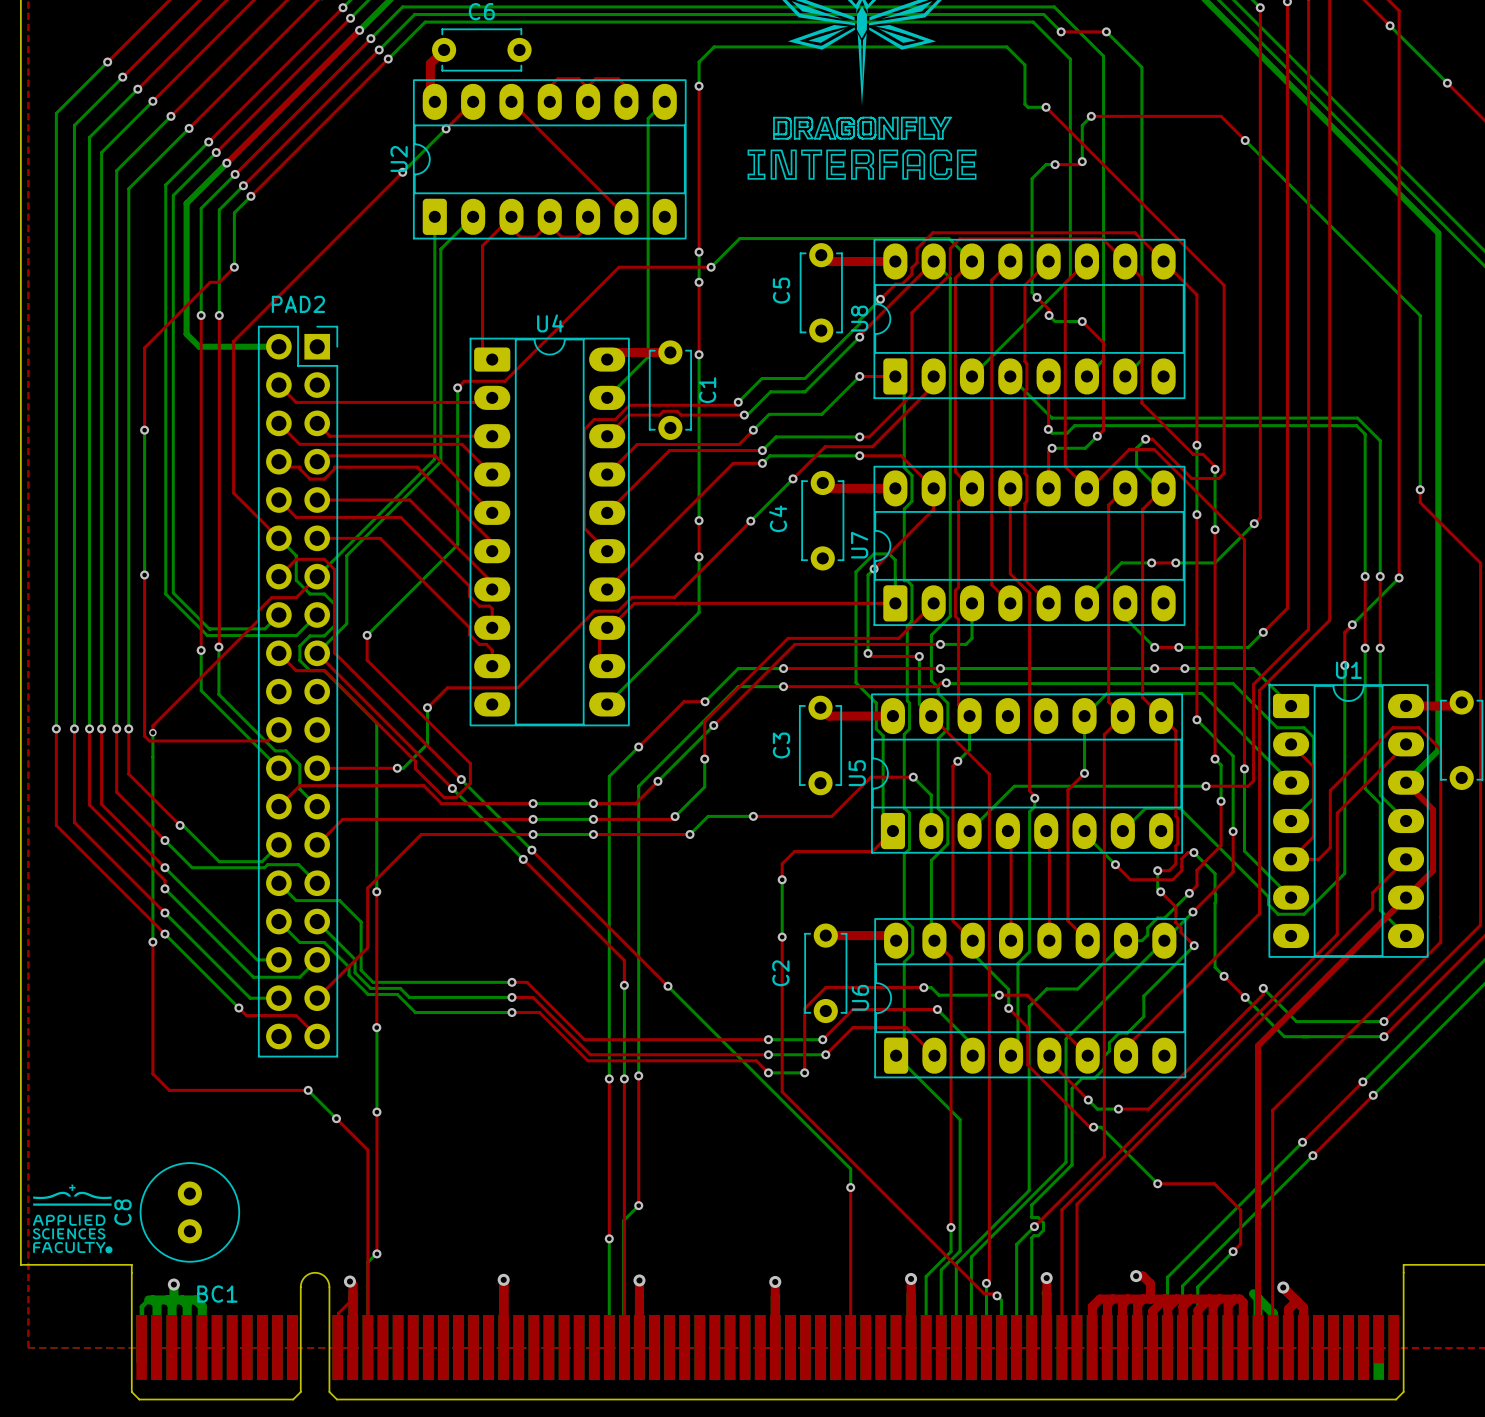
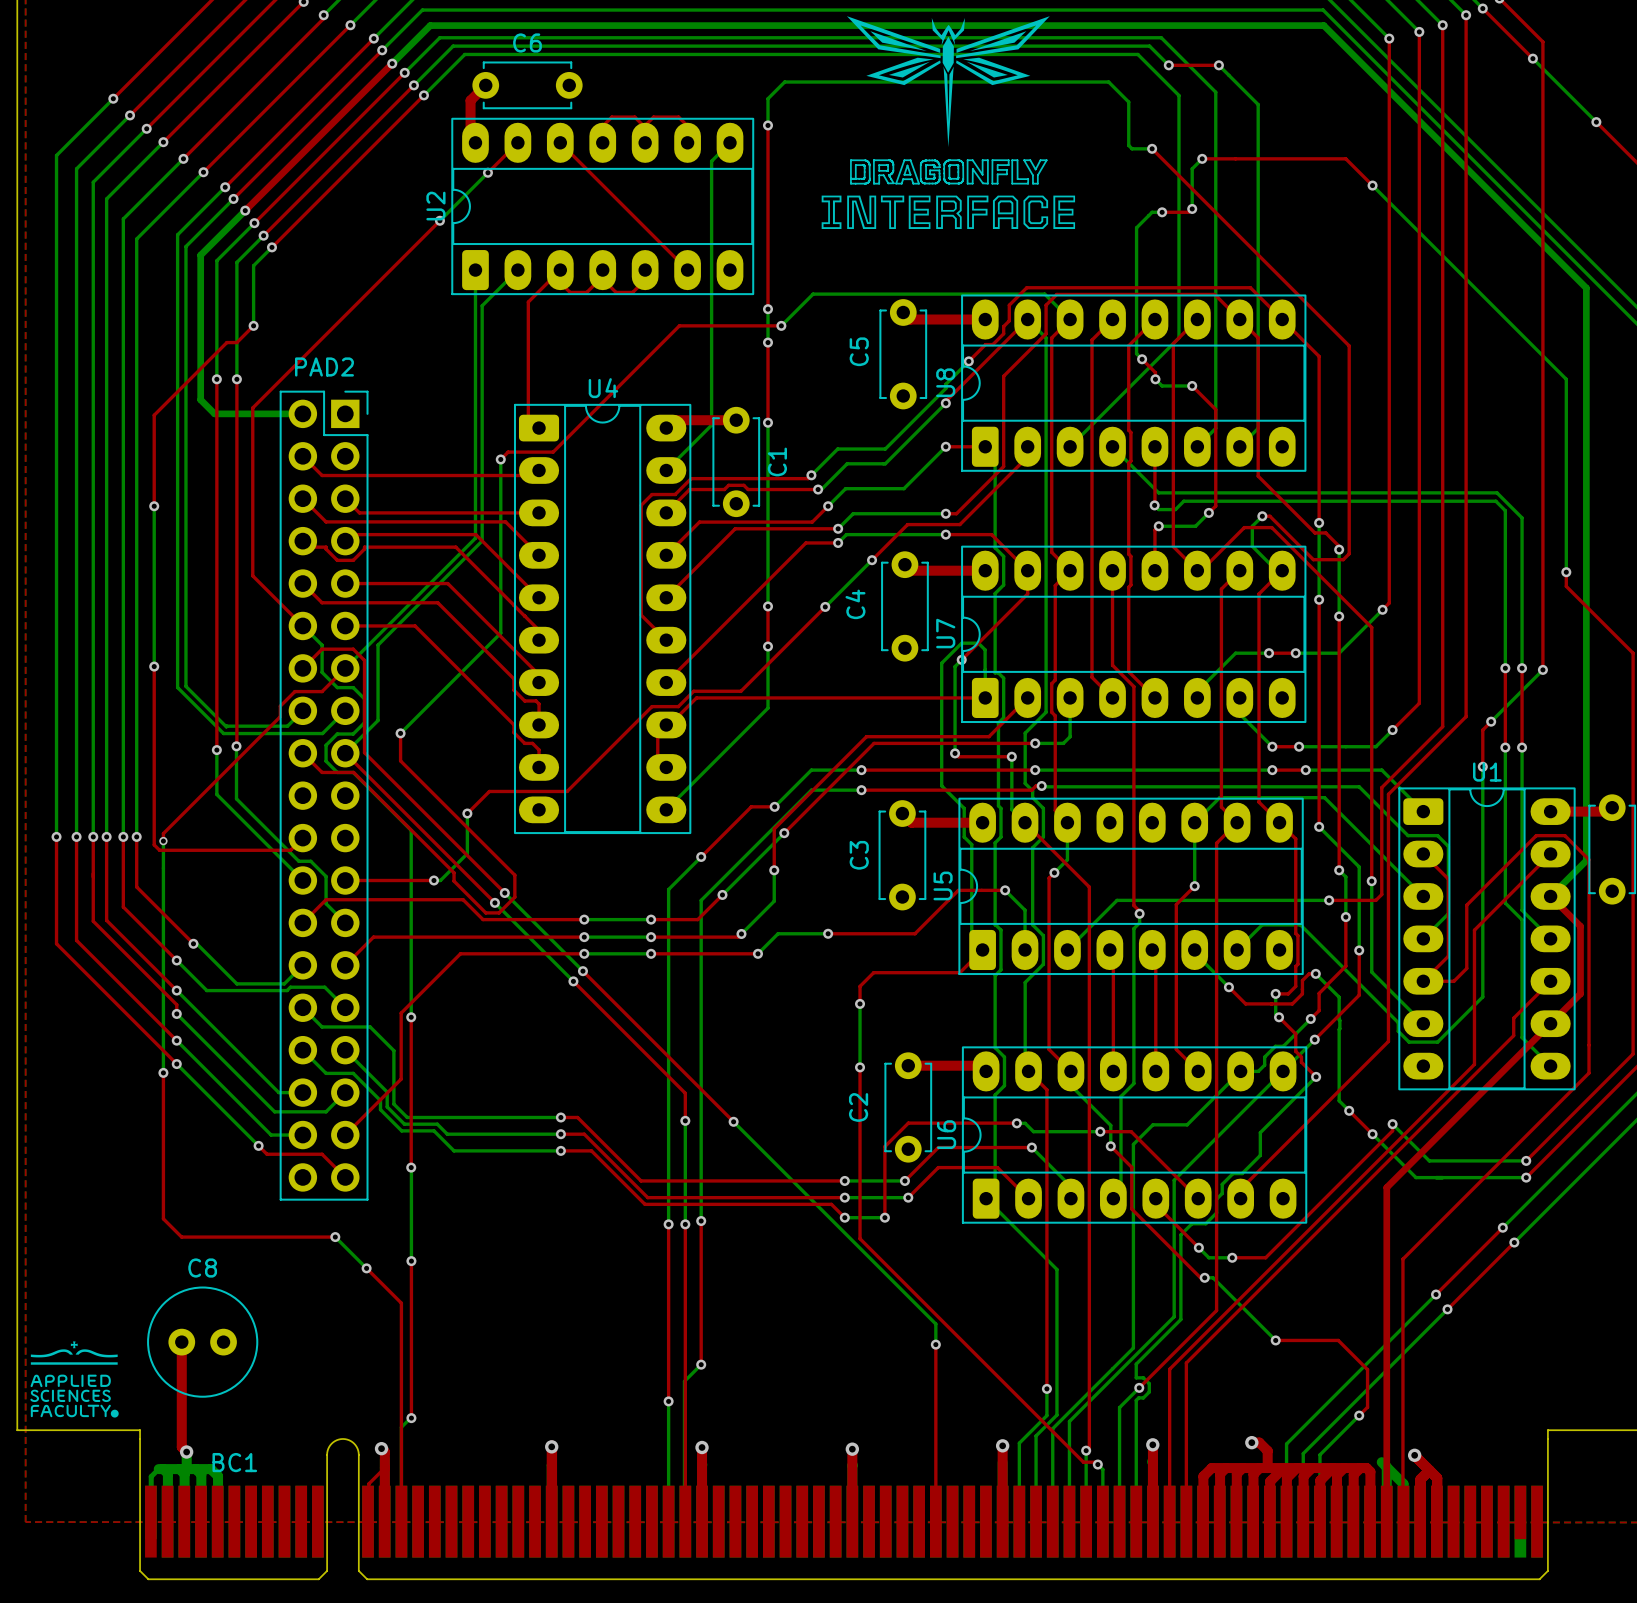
top track: none -> (181, 1342) (181, 1447) (186, 1452)
C8 rotation: 0° (189, 1212) -> 90° clockwise (202, 1342)

